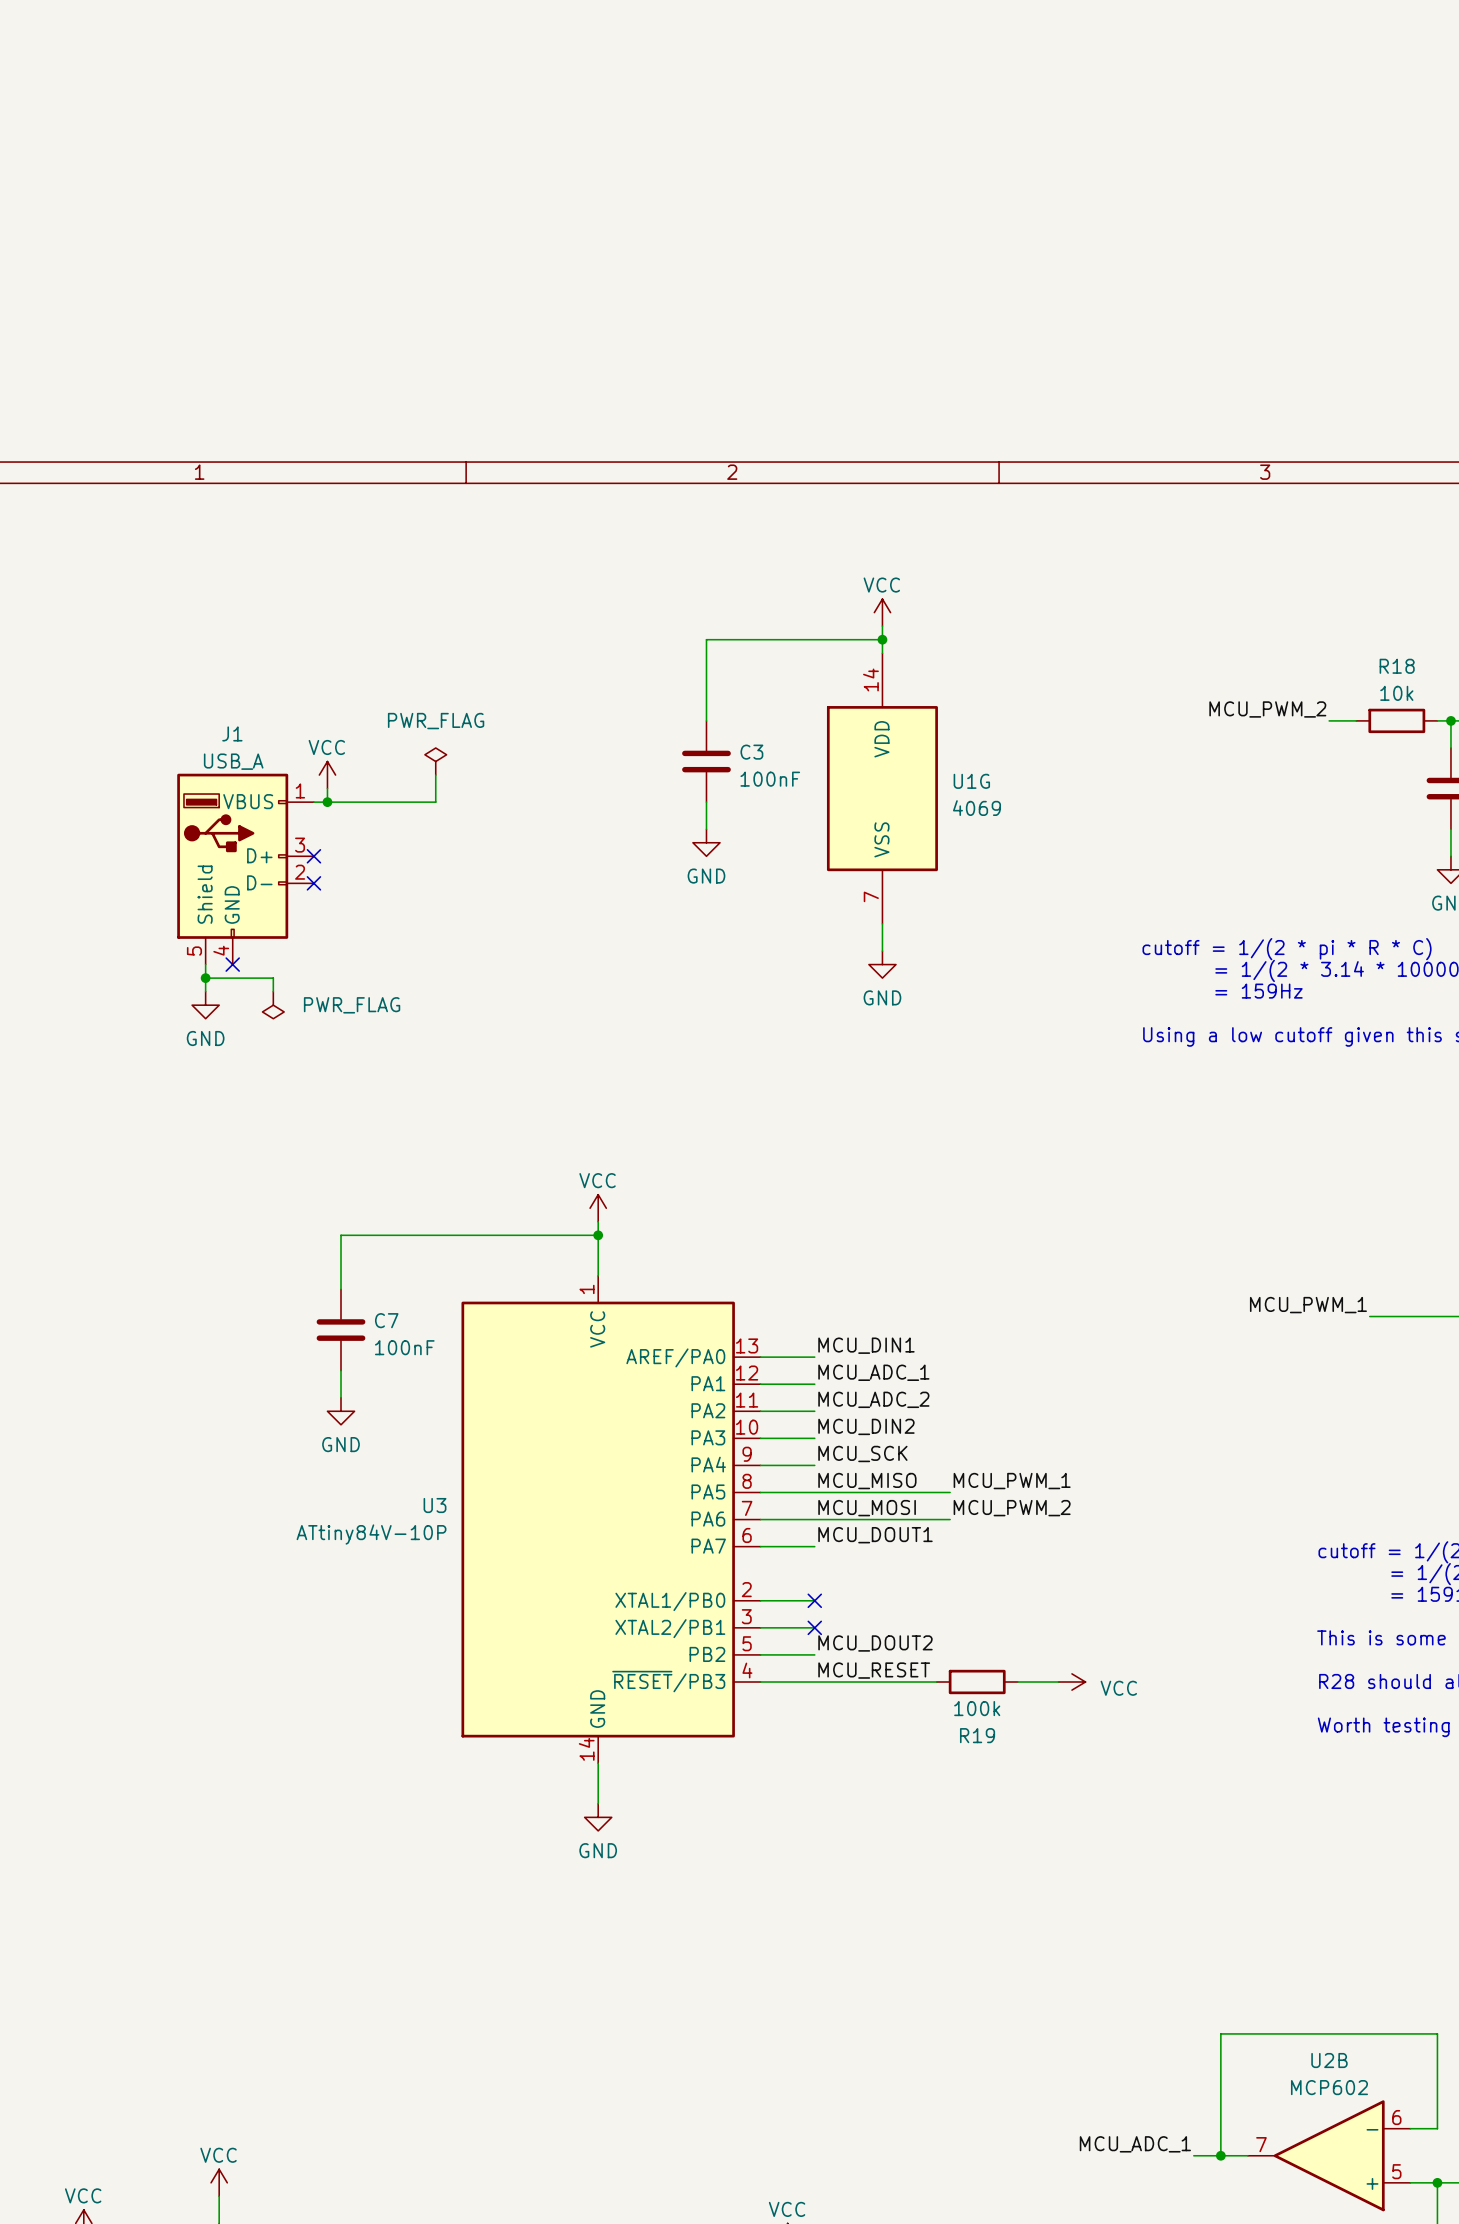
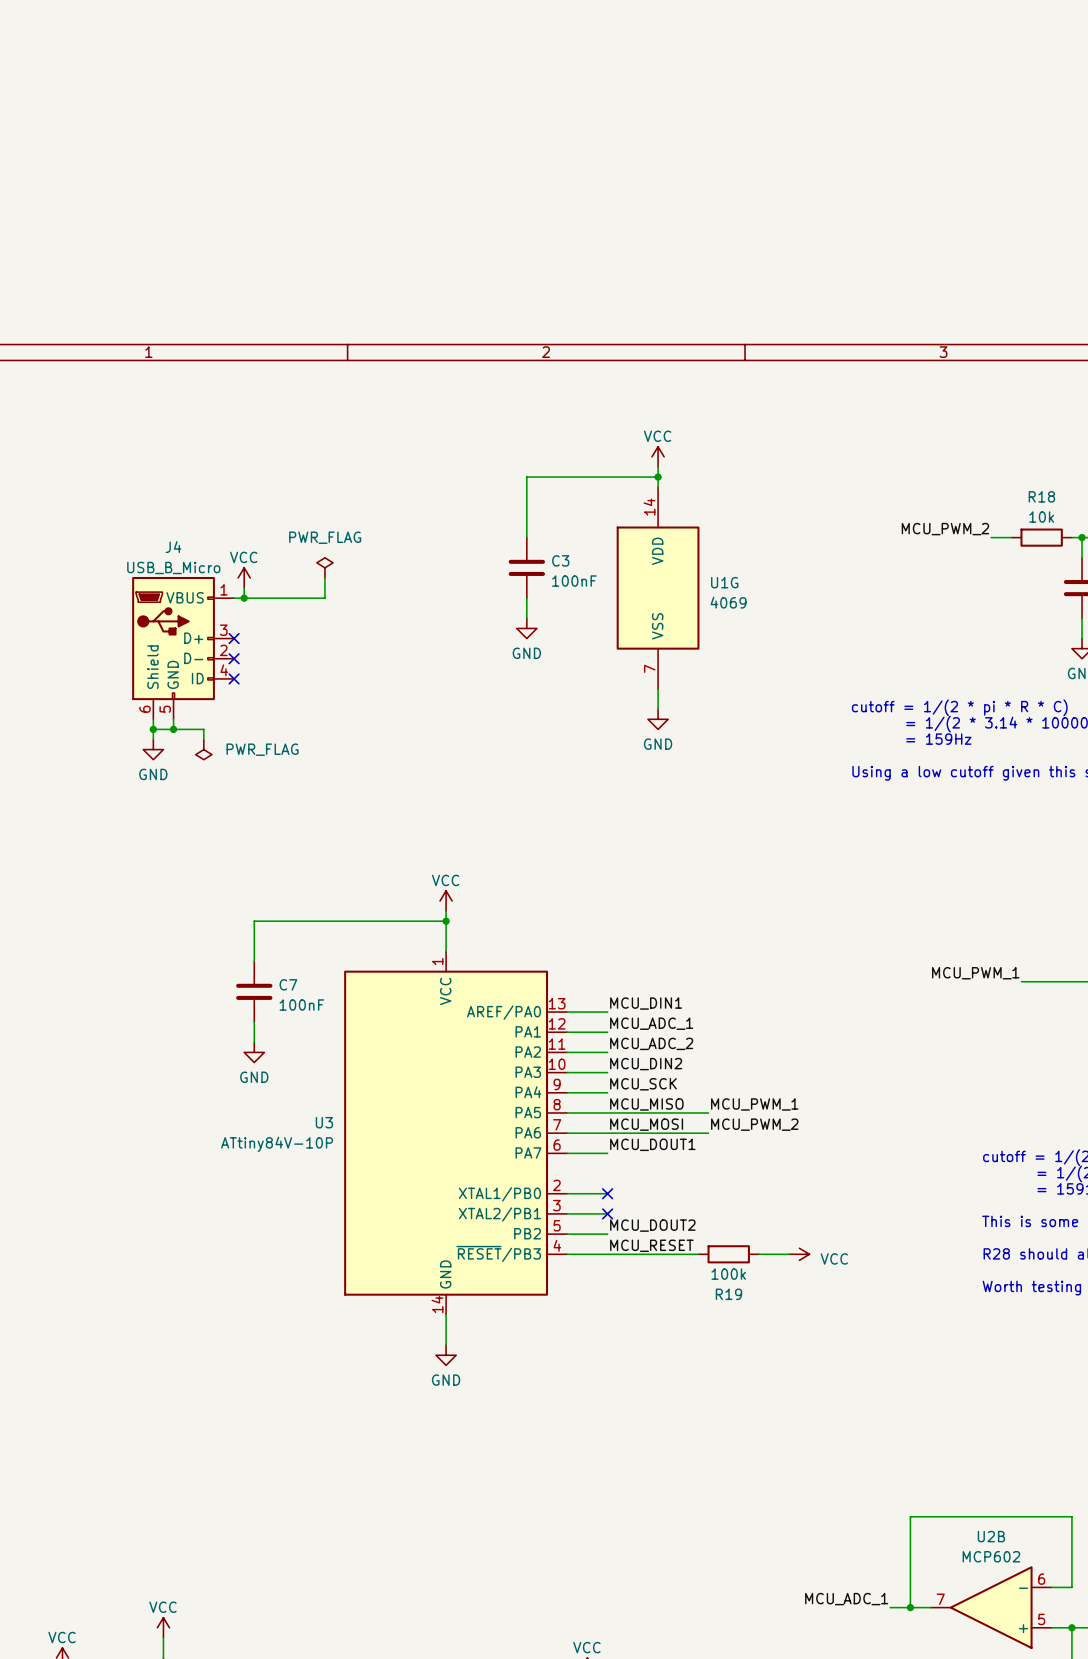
J1: USB_A (245, 869) -> none
J4: none -> USB_B_Micro (183, 648)
no-connect mark: none -> (234, 678)
wire: none -> (173, 719) (173, 729)
no-connect mark: (232, 964) -> none
junction: none -> (173, 729)

